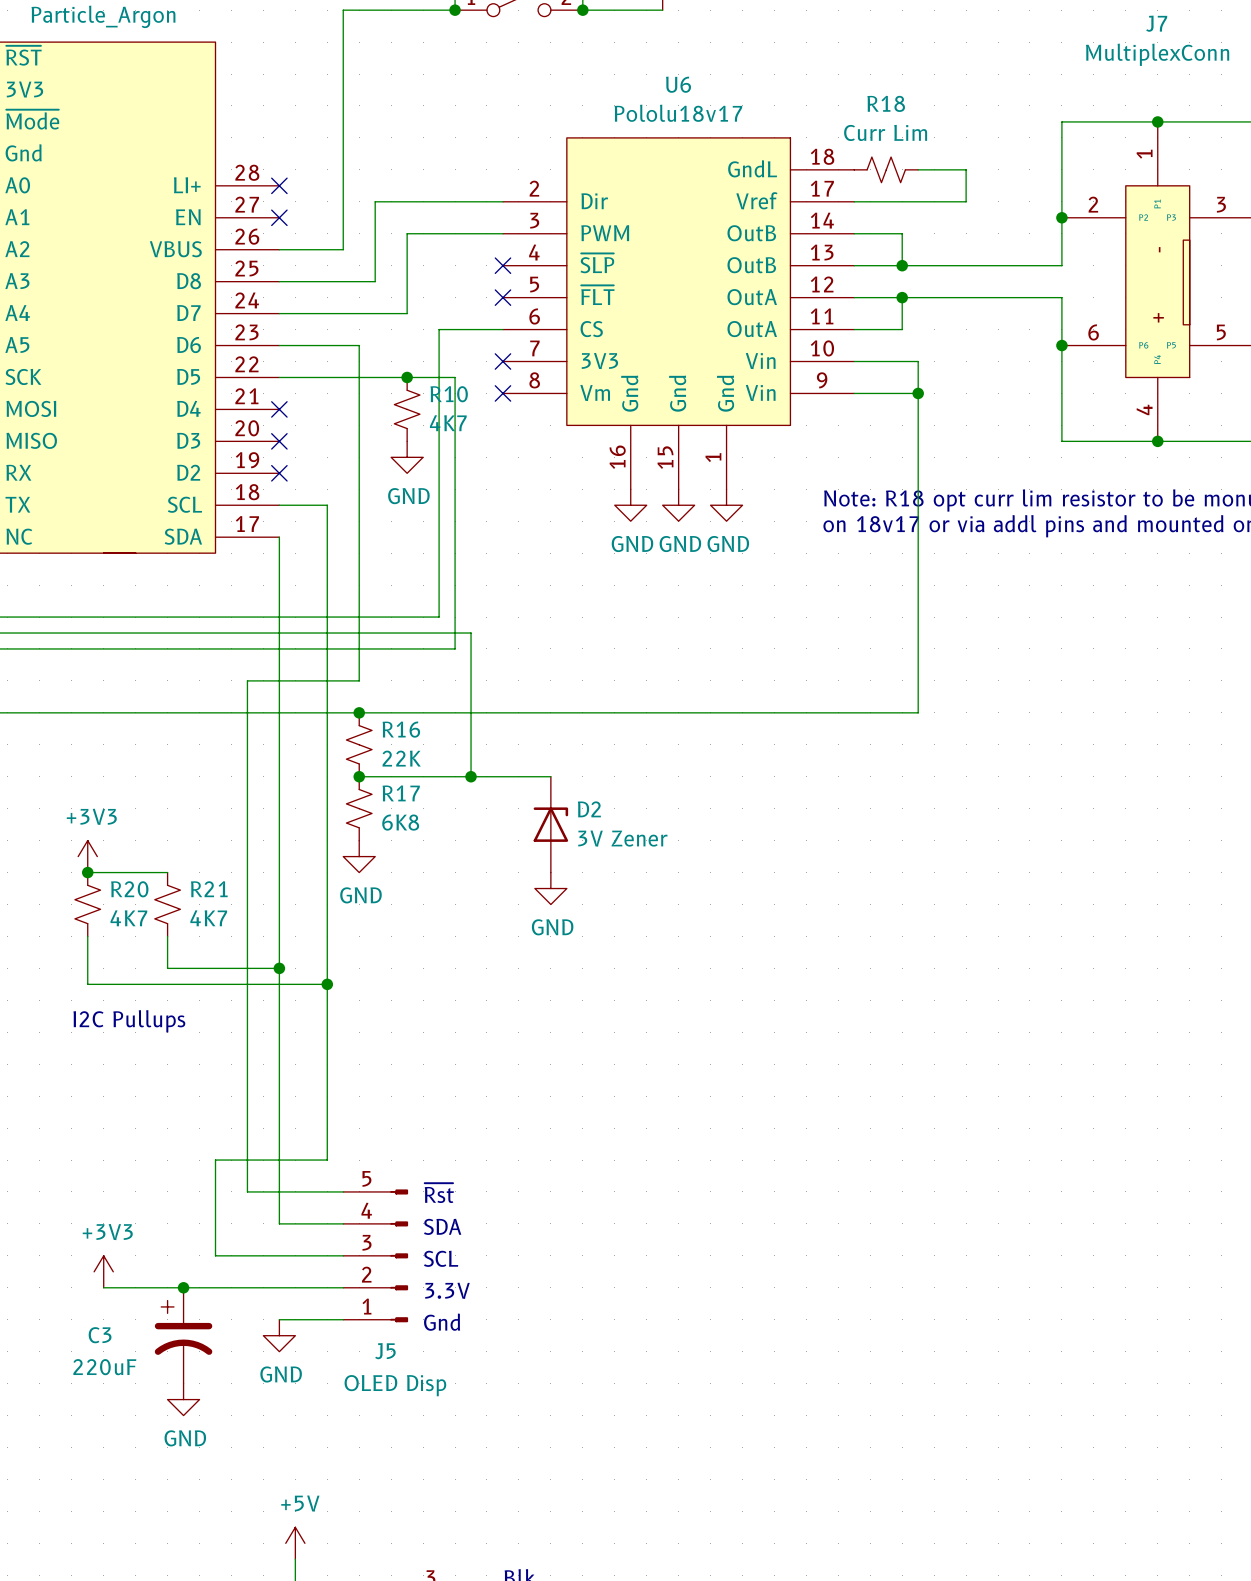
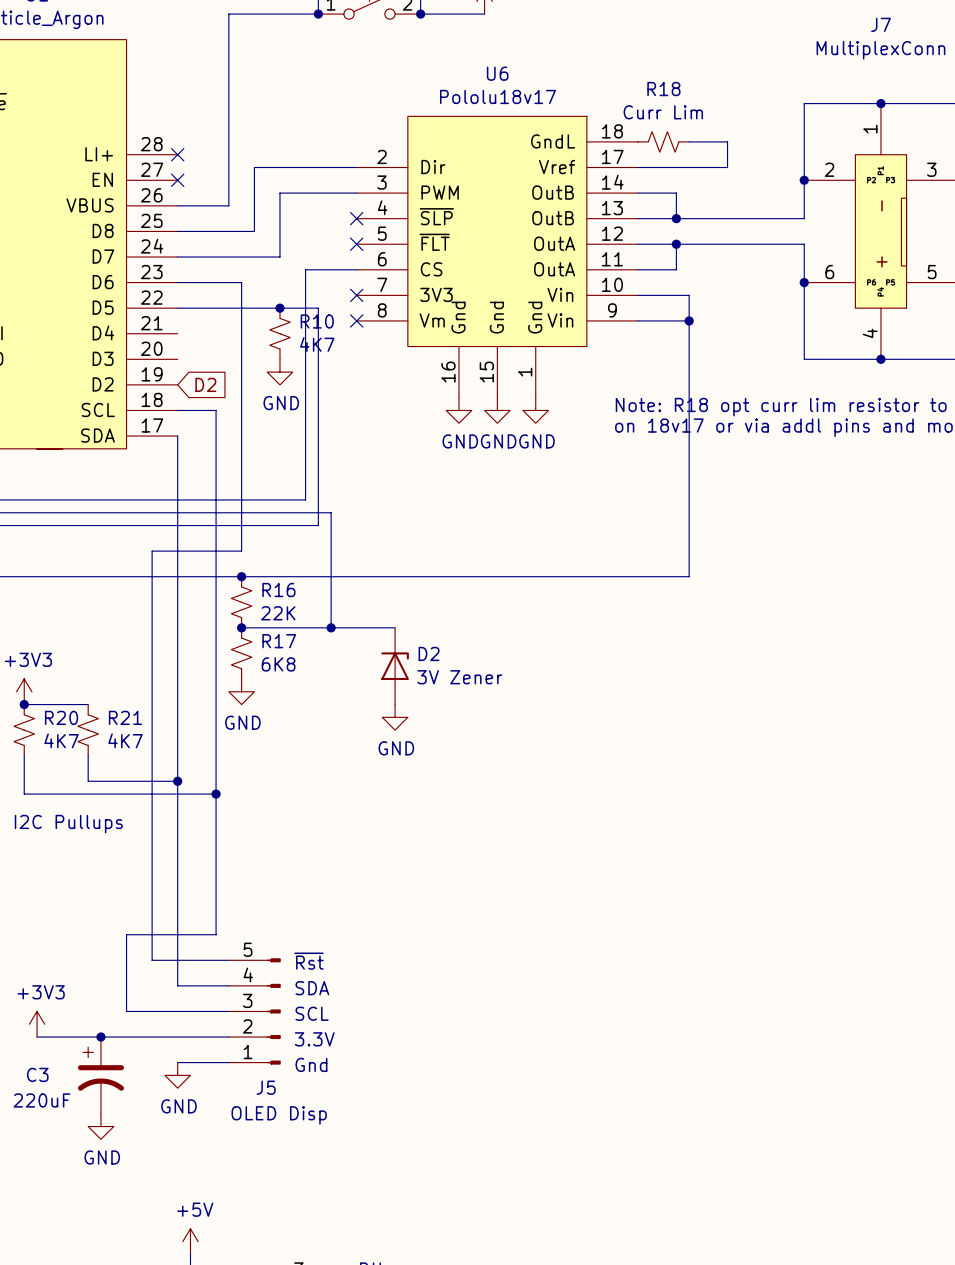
no-connect mark: (279, 409) -> none
no-connect mark: (279, 441) -> none
no-connect mark: (279, 473) -> none
global label: none -> D2 (205, 384)

